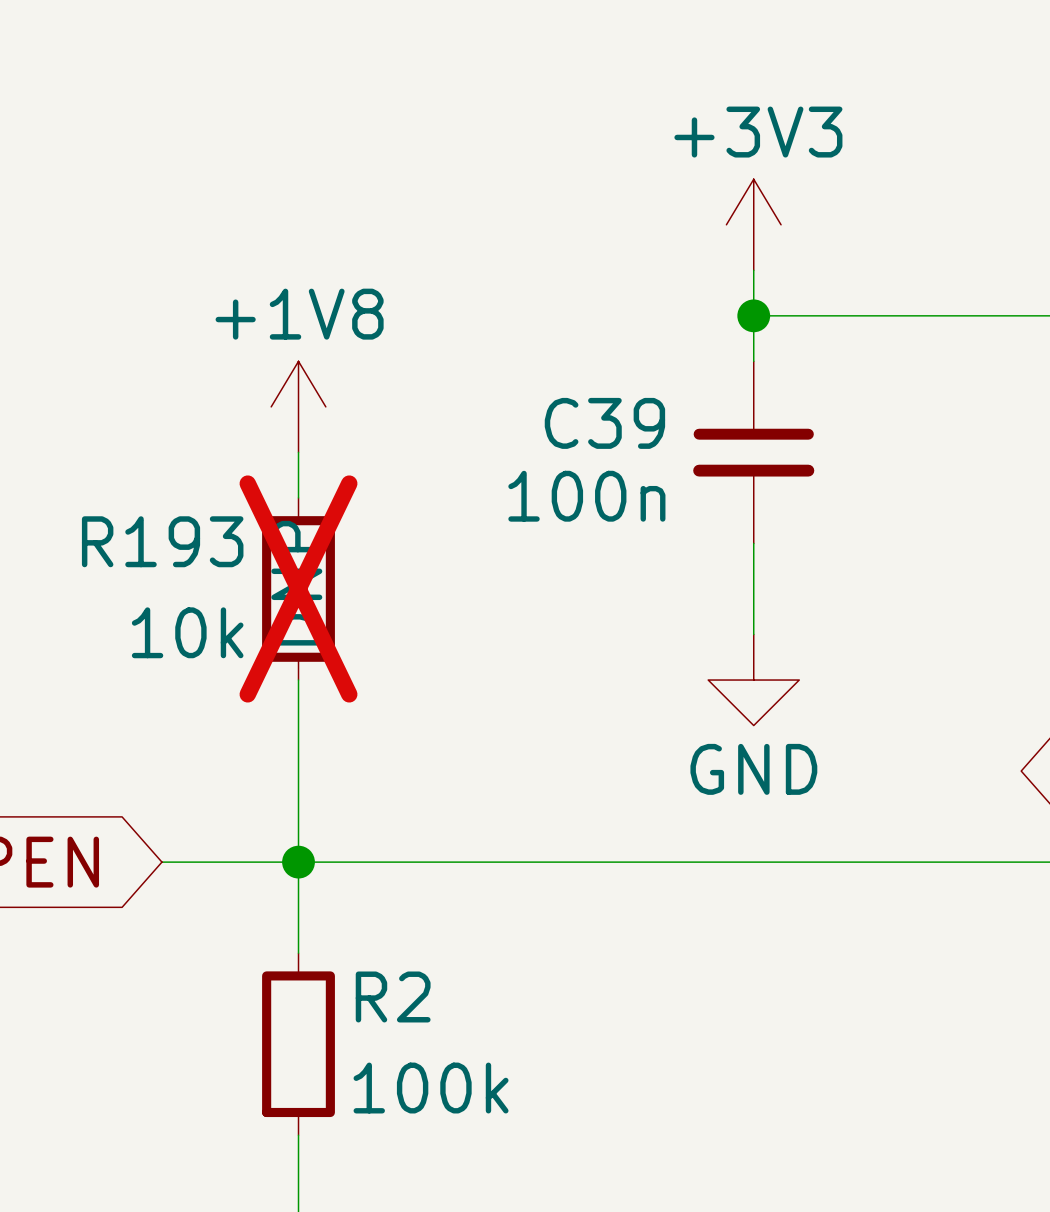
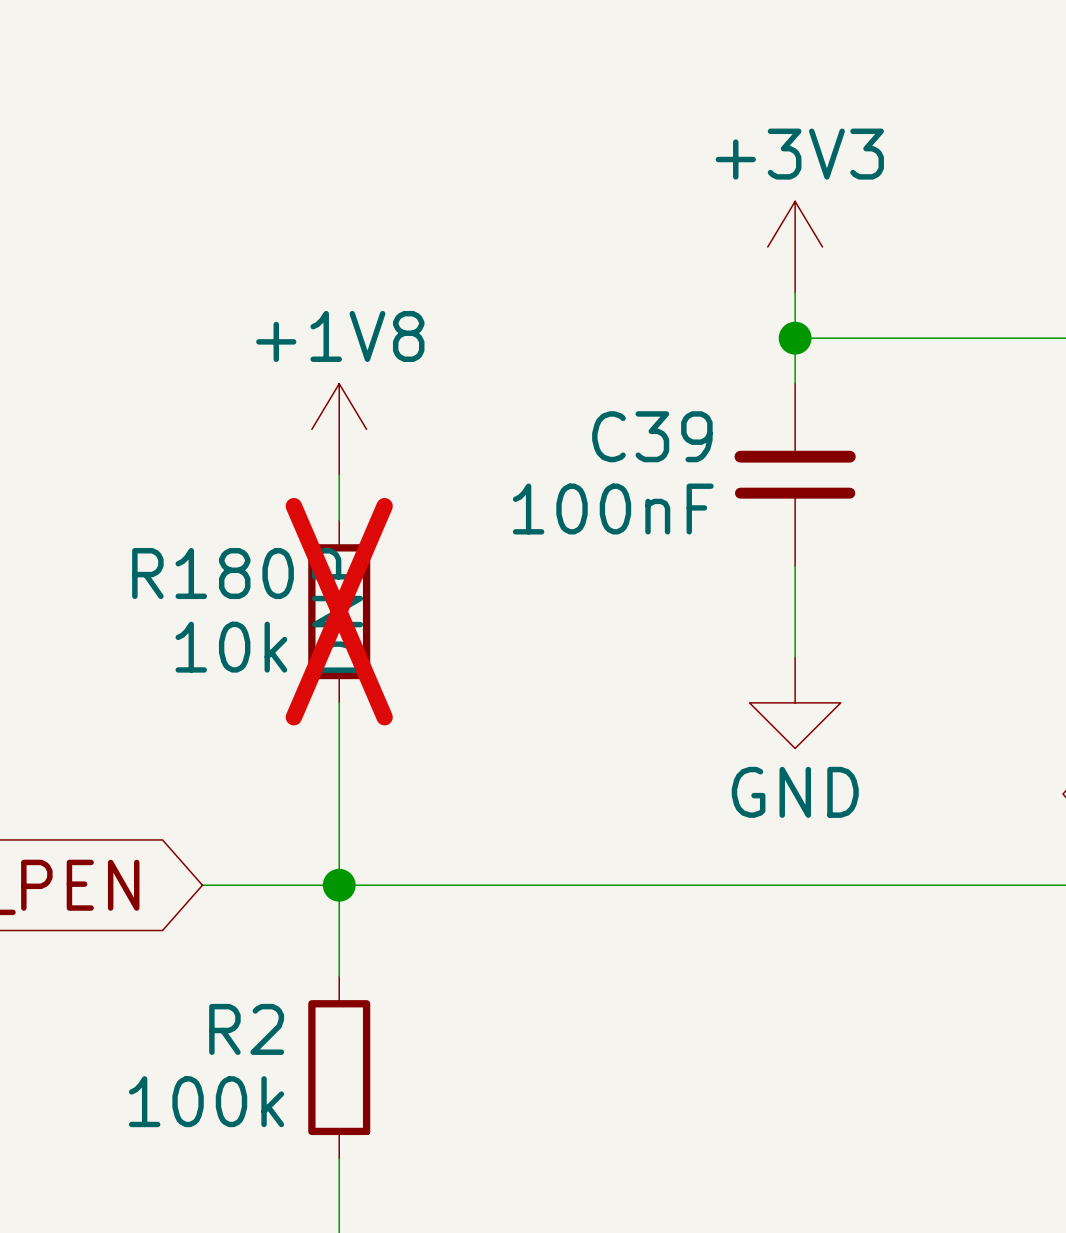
C39 rotation: 0° (753, 452) -> 180° (795, 474)
C39 value: none -> 100nF (613, 509)
C39 text: 100n (586, 496) -> none
R193: (298, 588) -> none
R180: none -> 10k (339, 611)
R2 symbol: [262, 953, 335, 1136] -> [308, 976, 371, 1159]
R2 name position: R2 (393, 996) -> R2 (246, 1029)
R2 value: none -> 100k (206, 1101)
R2 text: 100k (431, 1088) -> none

